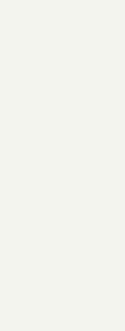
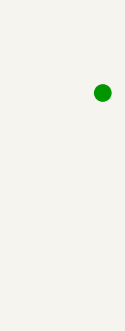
junction: none -> (102, 92)

